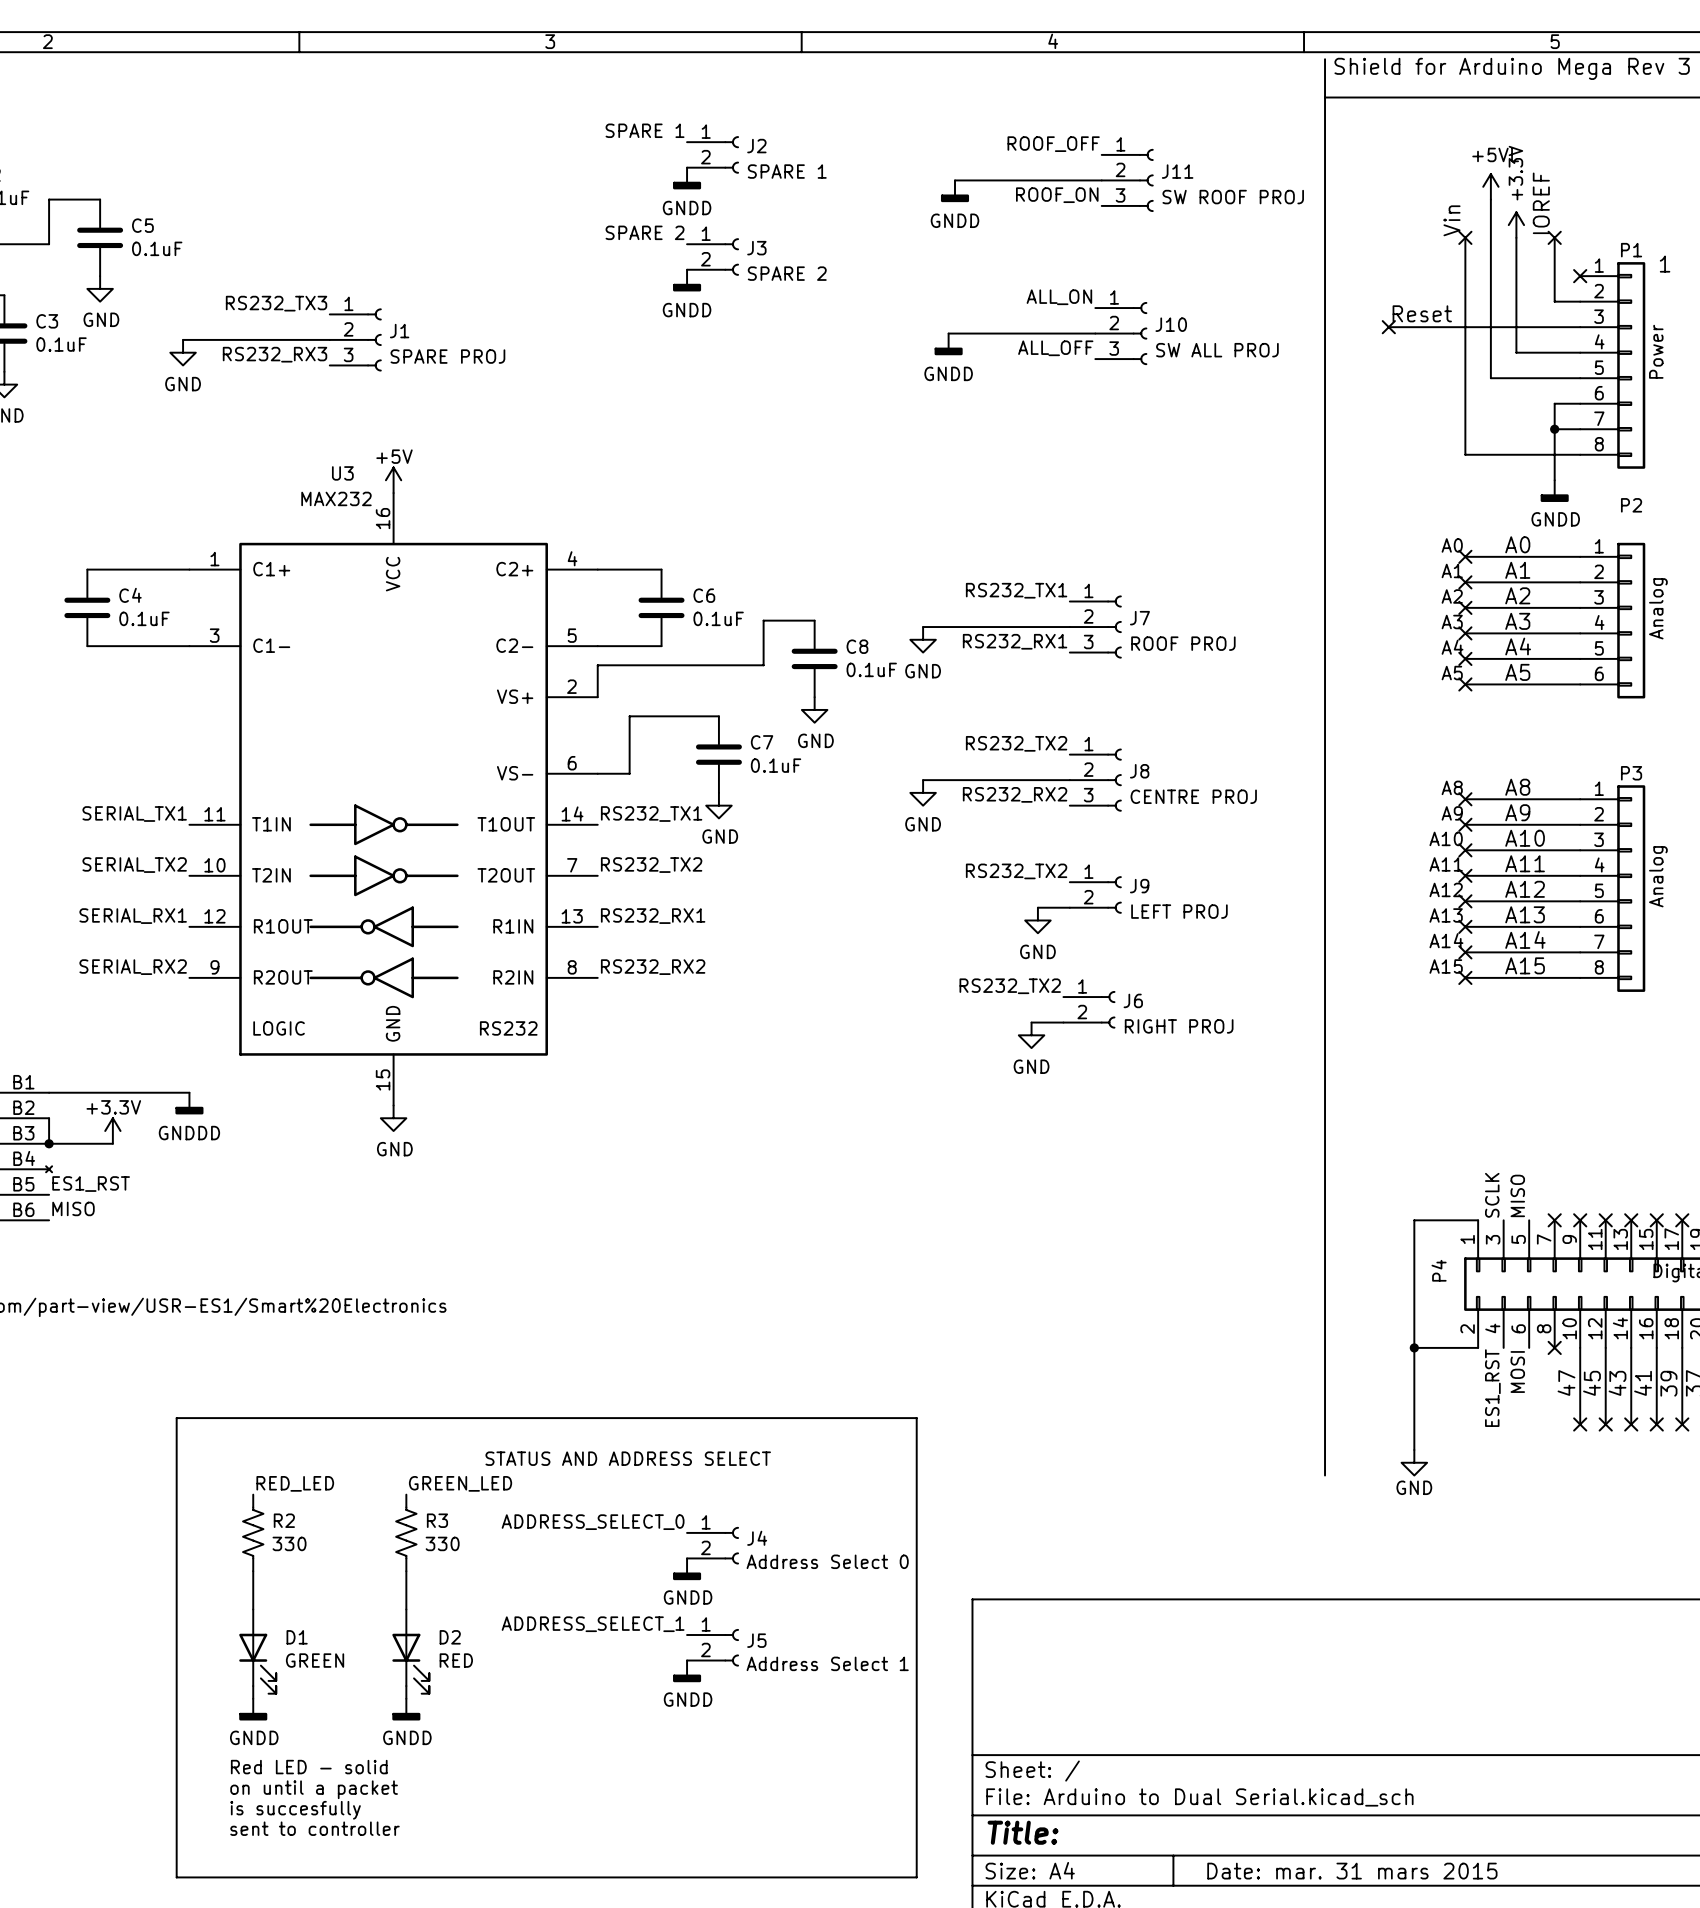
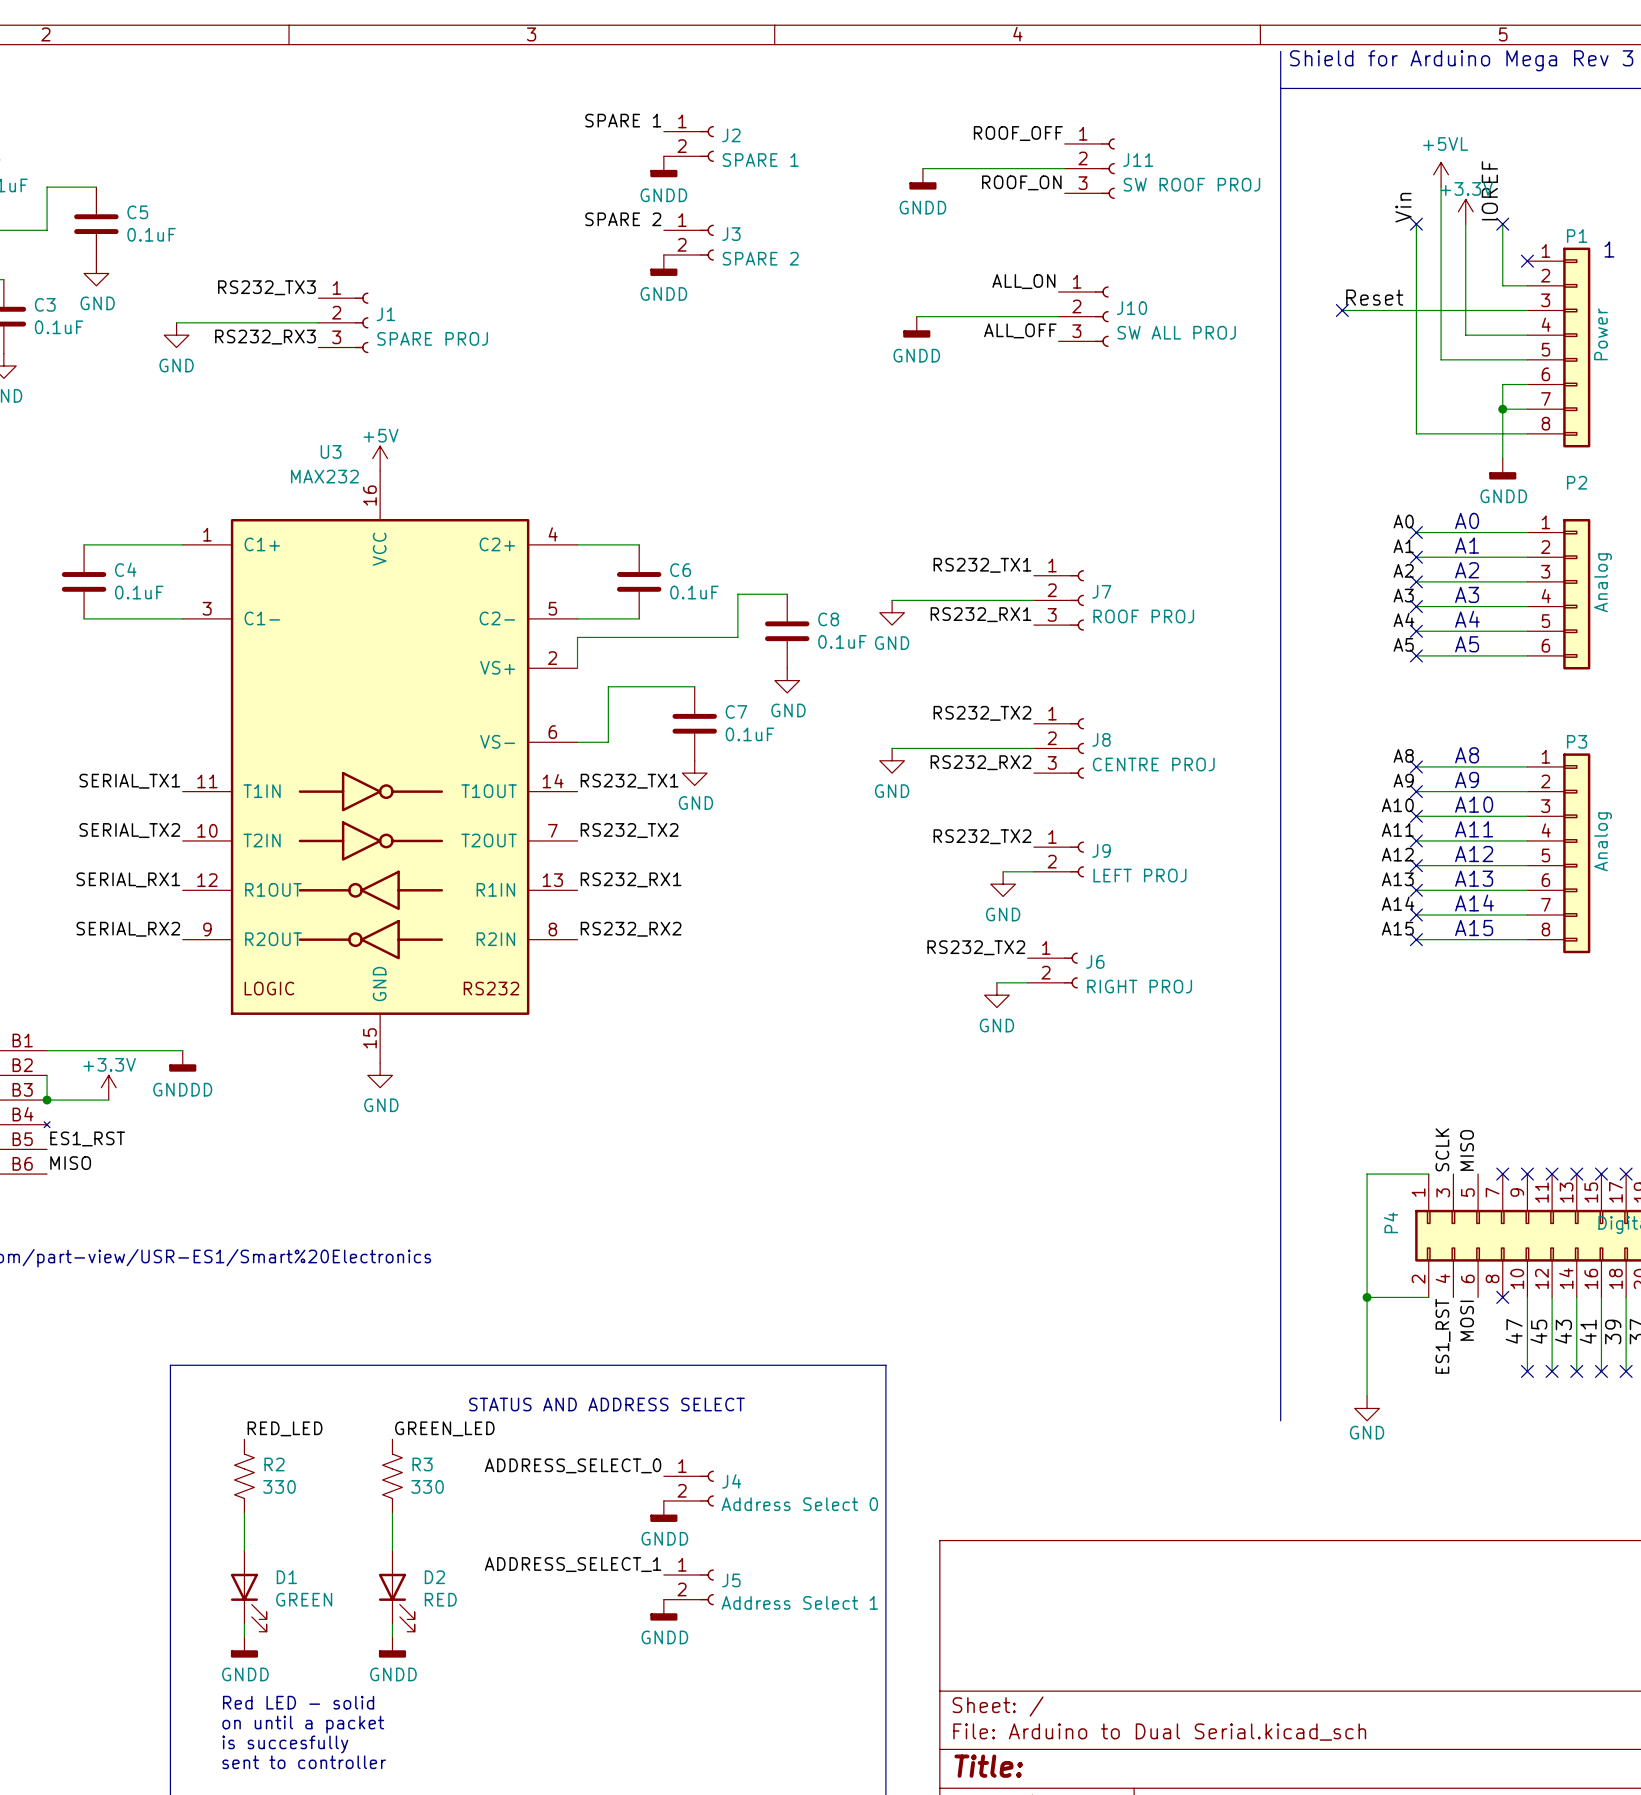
power symbol text rotation: 0° (1515, 173) -> 90° clockwise (1466, 188)

